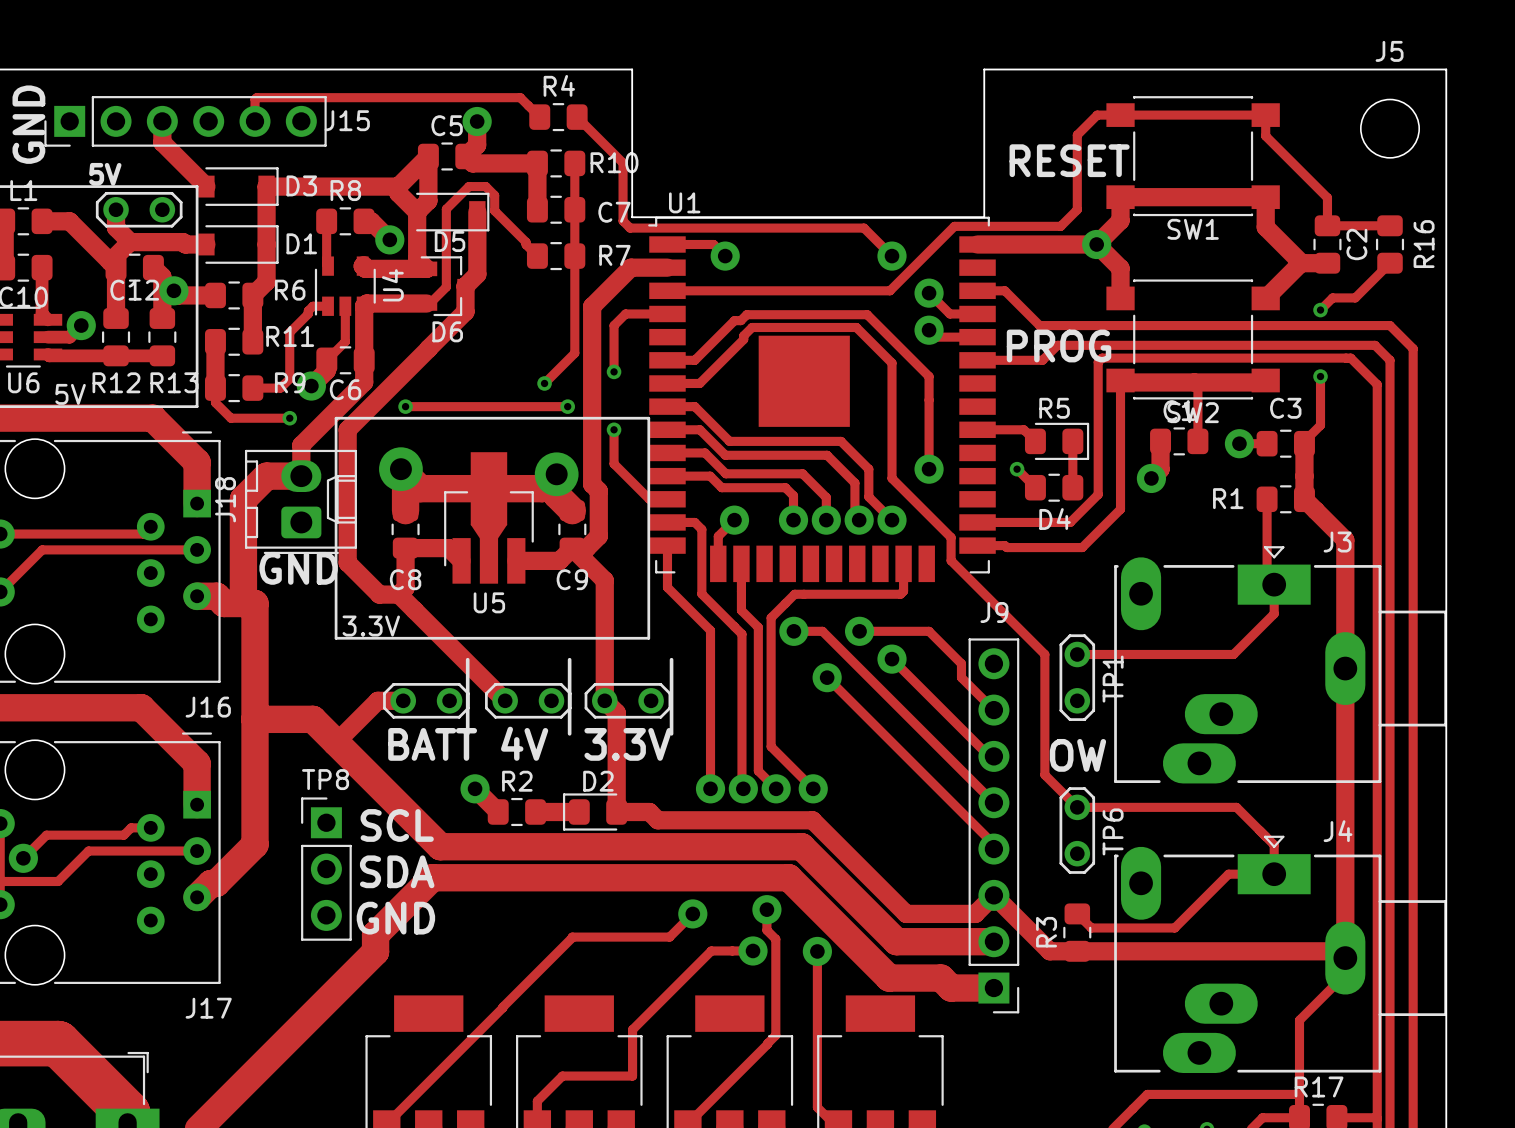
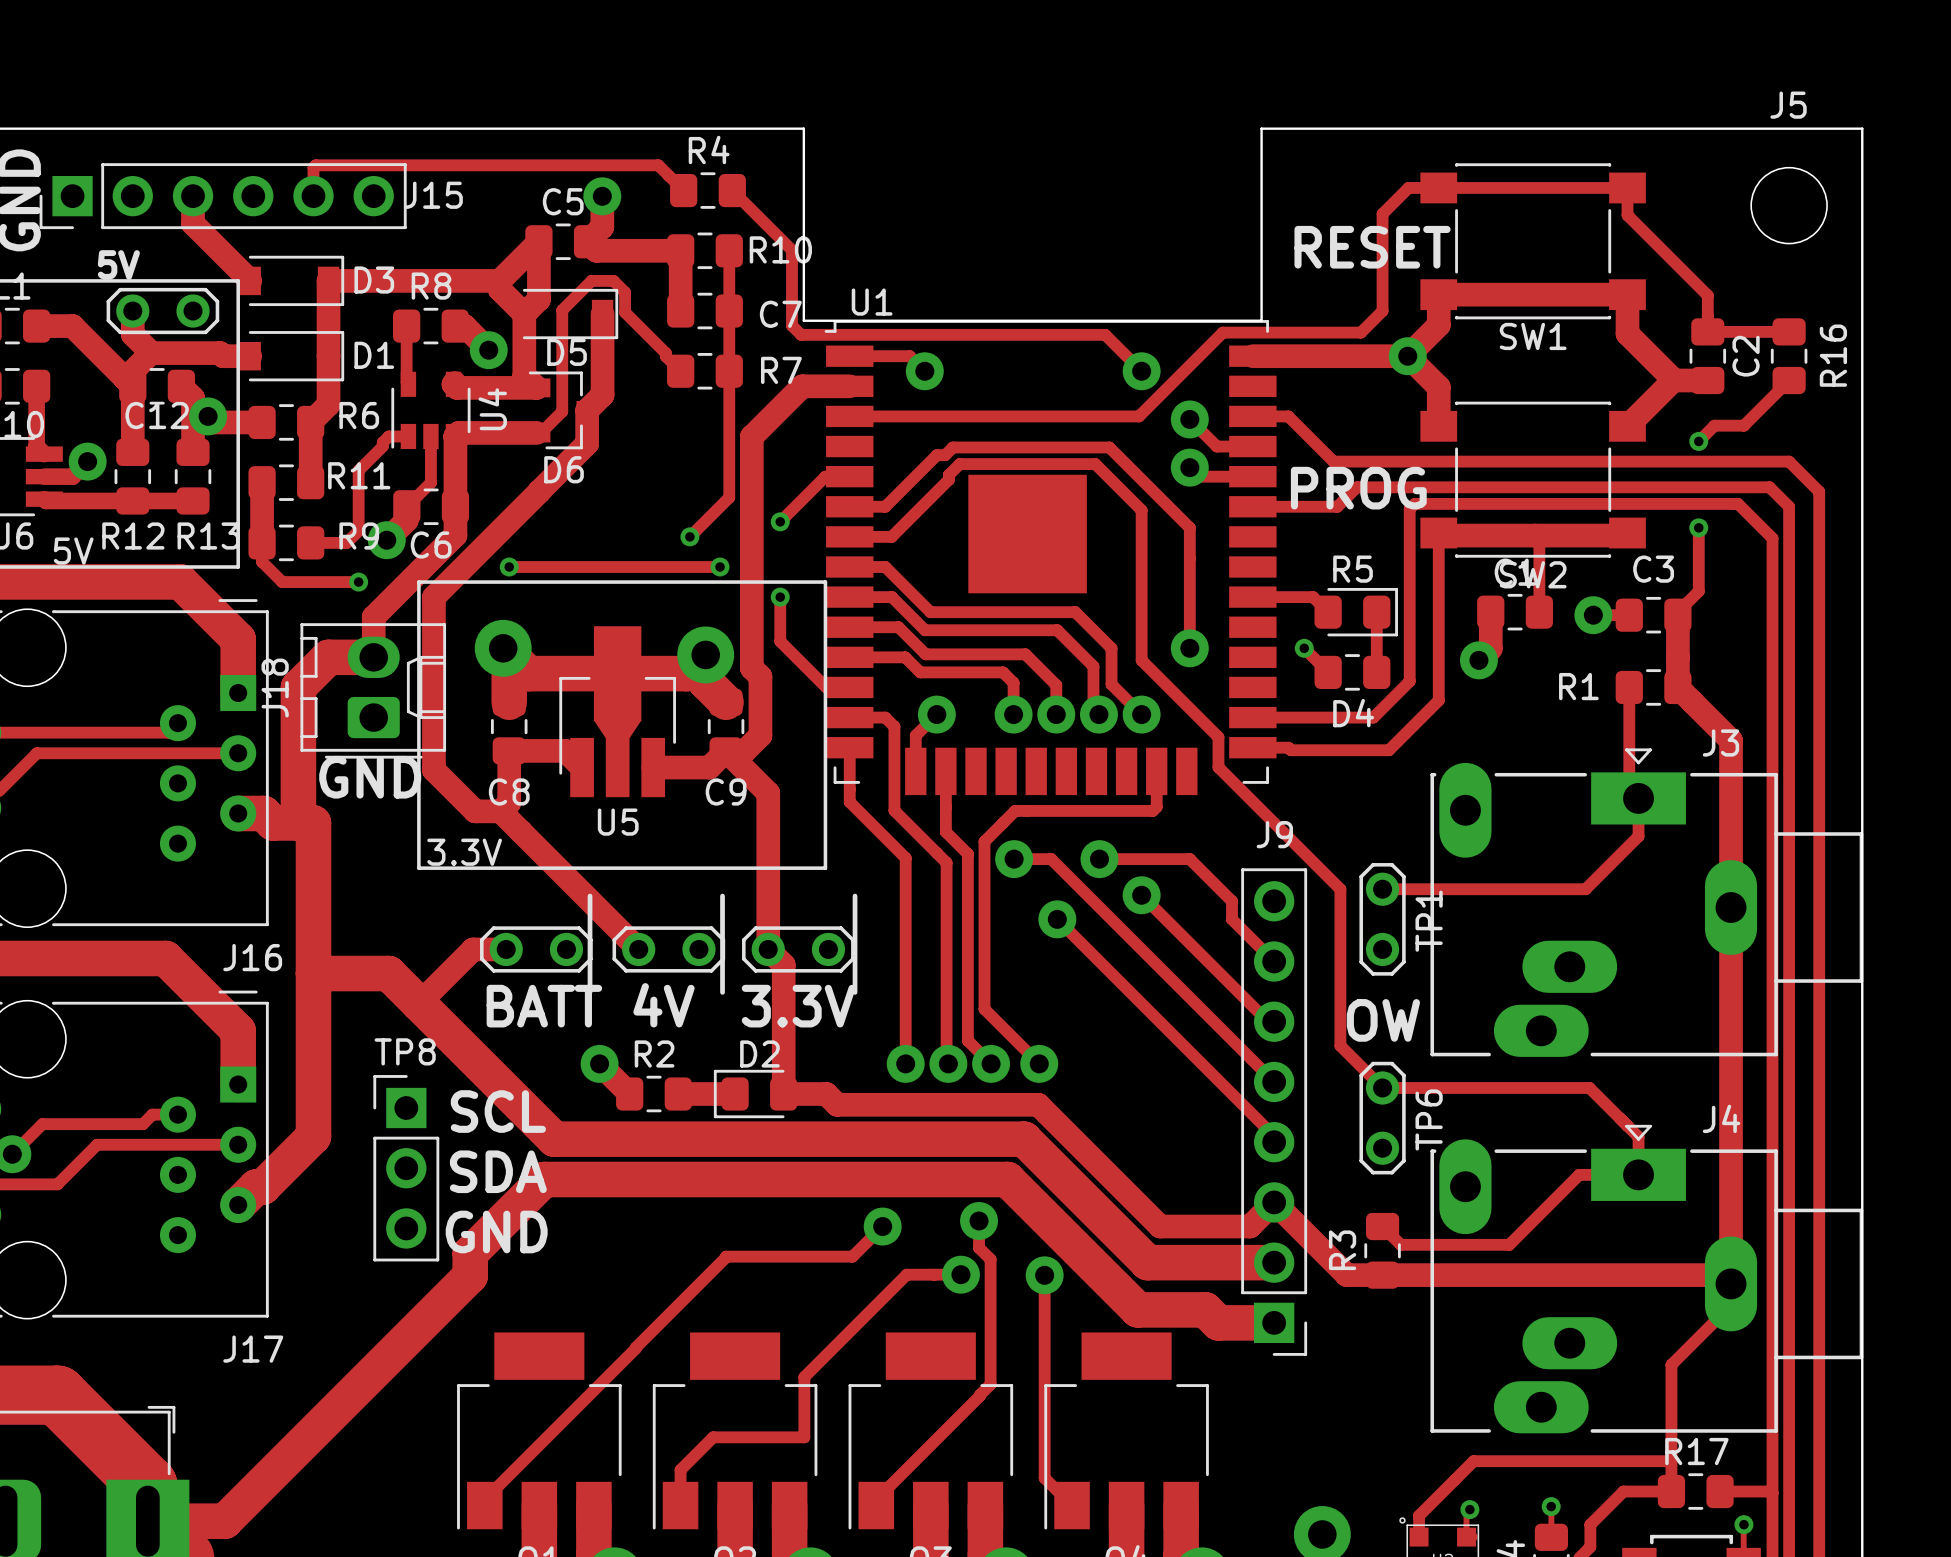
track: (667, 313) (625, 313) (614, 325) (614, 371) -> (849, 476) (825, 476) (780, 521)

